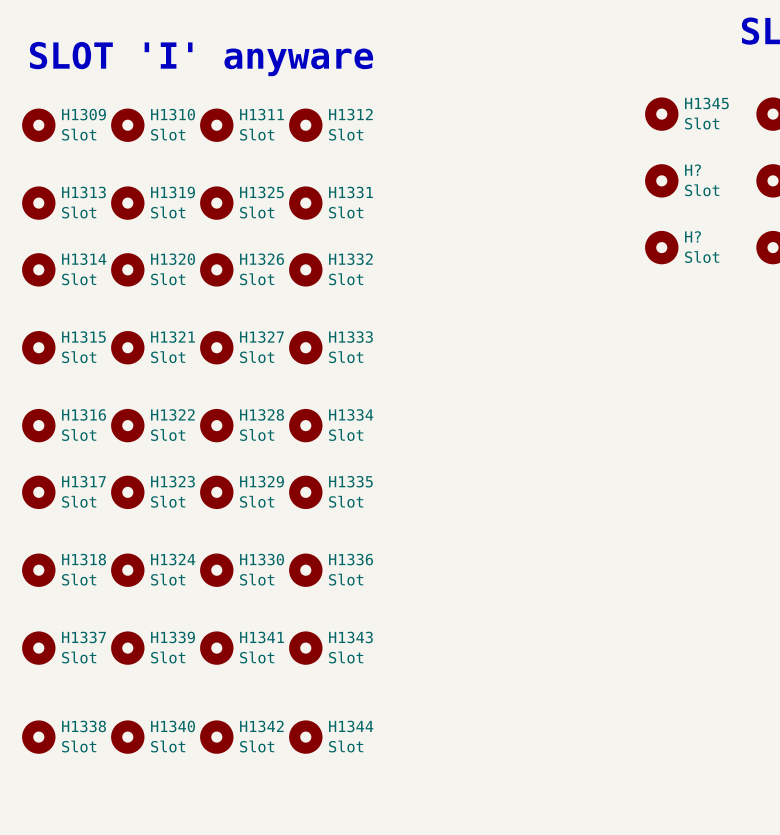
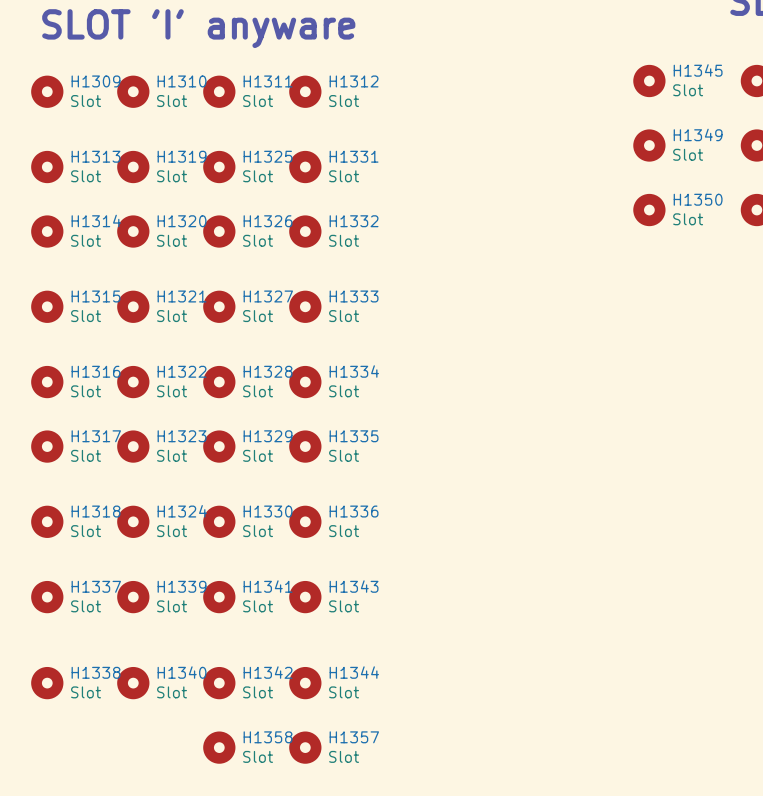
H? name: H? (693, 170) -> H1349 (698, 134)
H? name: H? (693, 236) -> H1350 (698, 199)
H1358: none -> Slot (219, 747)
H1357: none -> Slot (305, 747)

